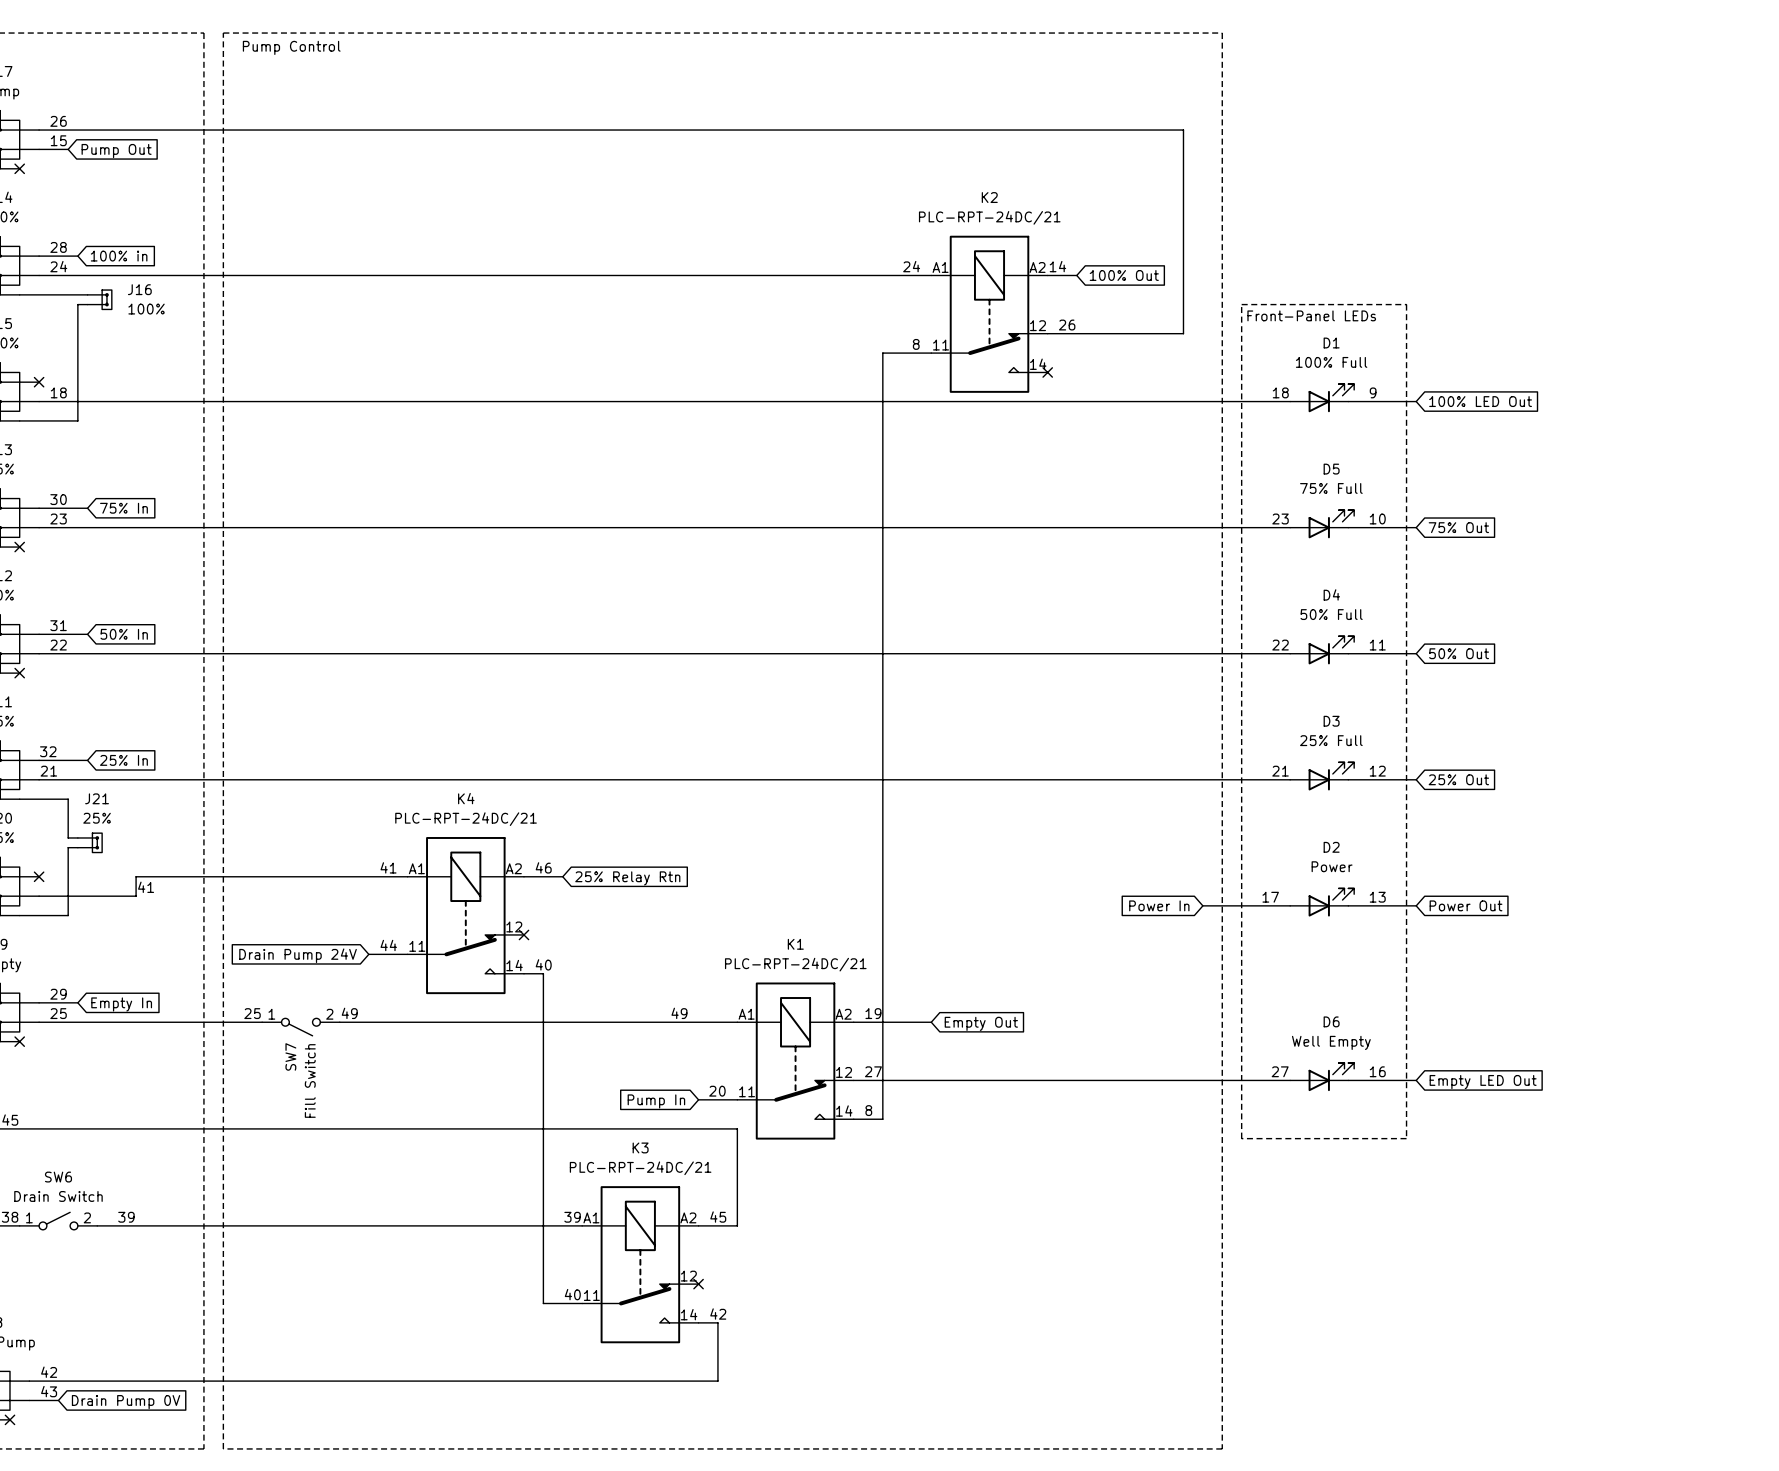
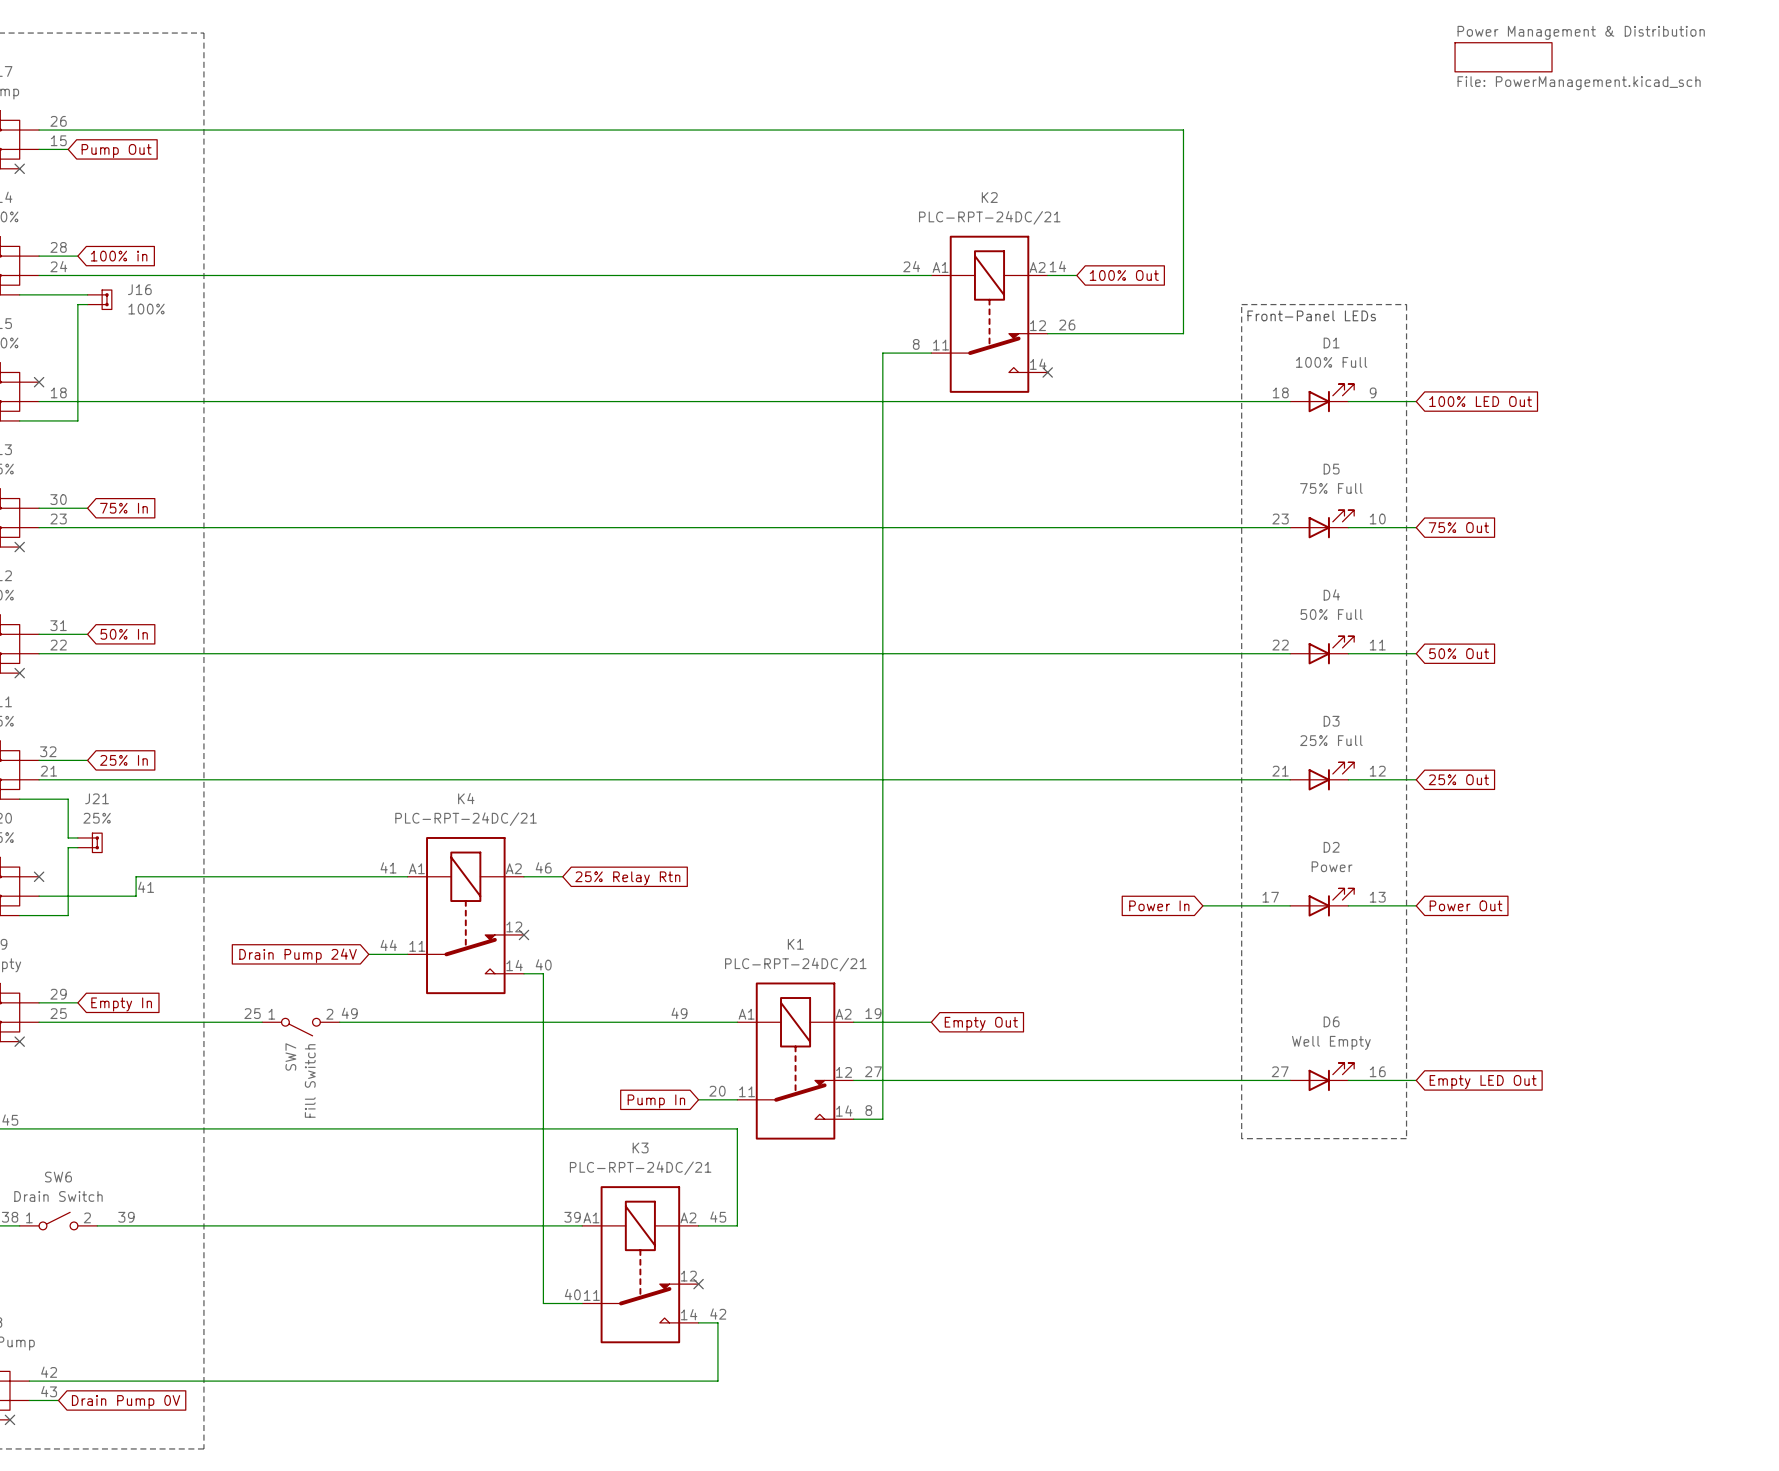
line: (223, 33) (1222, 33) (1222, 1448) (223, 1448) (223, 33) -> none
text: Pump Control (291, 47) -> none
sheet Power Management & Distribution: none -> File: PowerManagement.kicad_sch (1503, 57)

